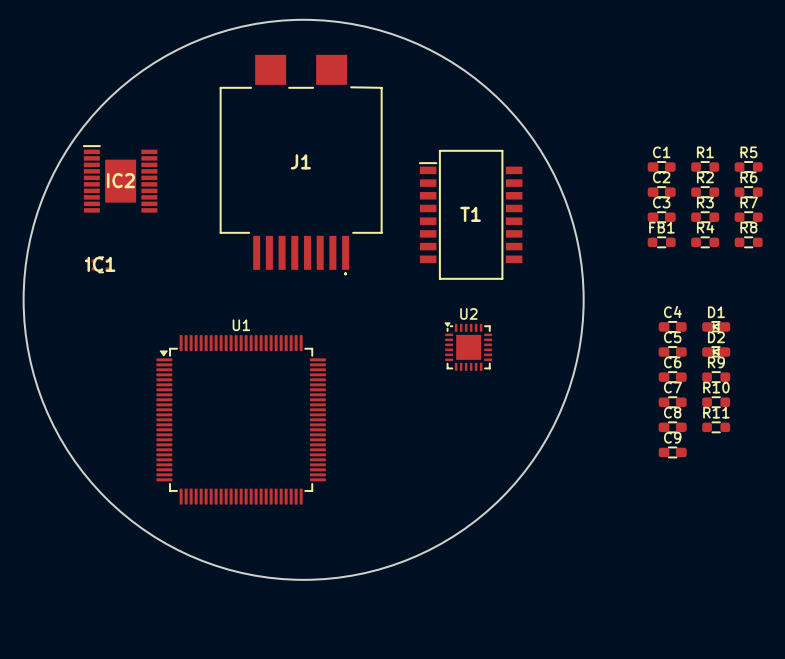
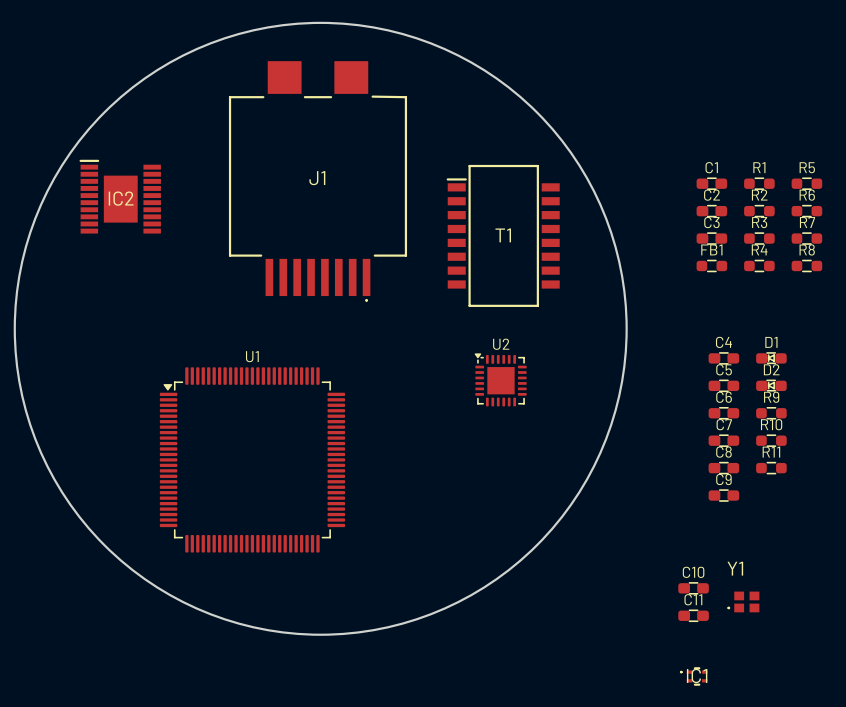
IC1 position: (98, 264) -> (693, 676)
C10: none -> (693, 588)
Y1: none -> (743, 601)
C11: none -> (693, 615)

